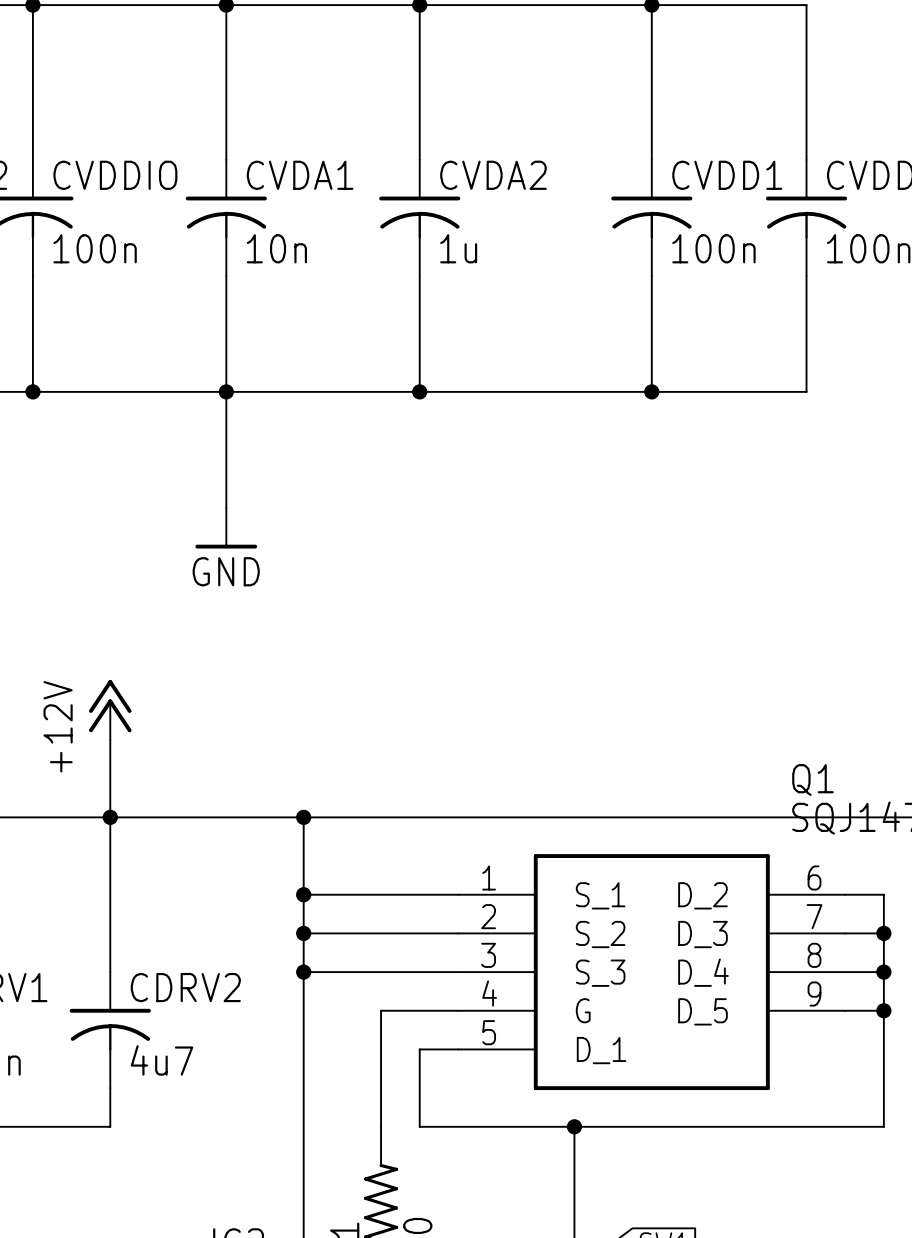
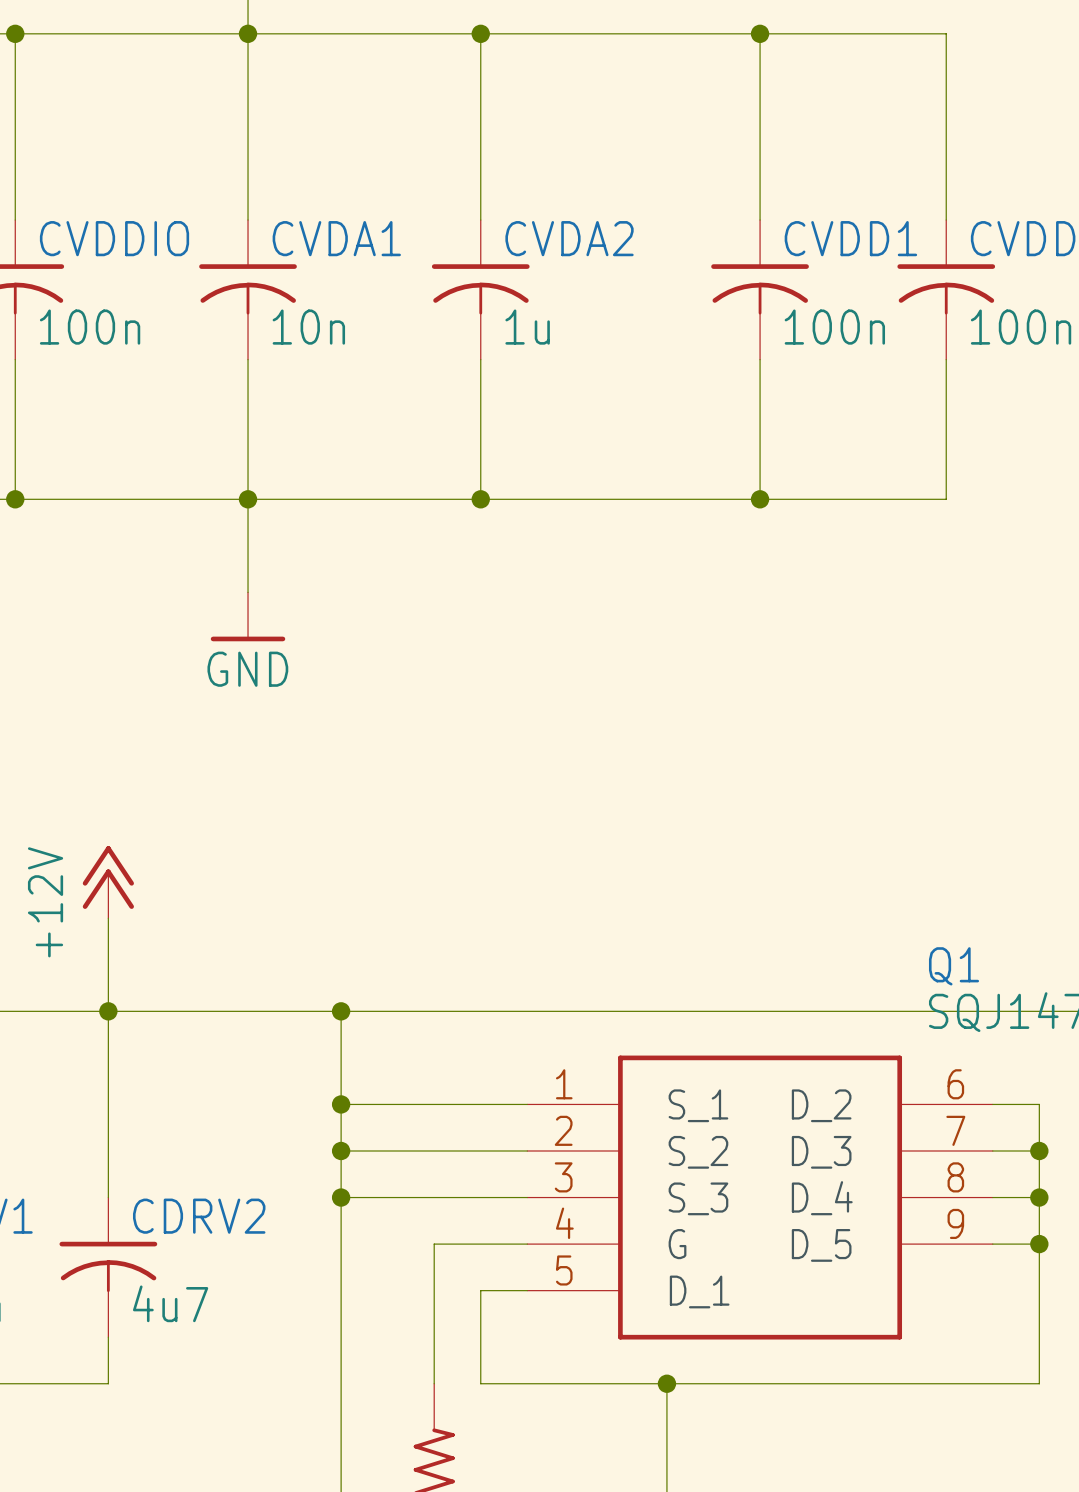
power symbol position: GND (226, 528) -> GND (248, 616)

